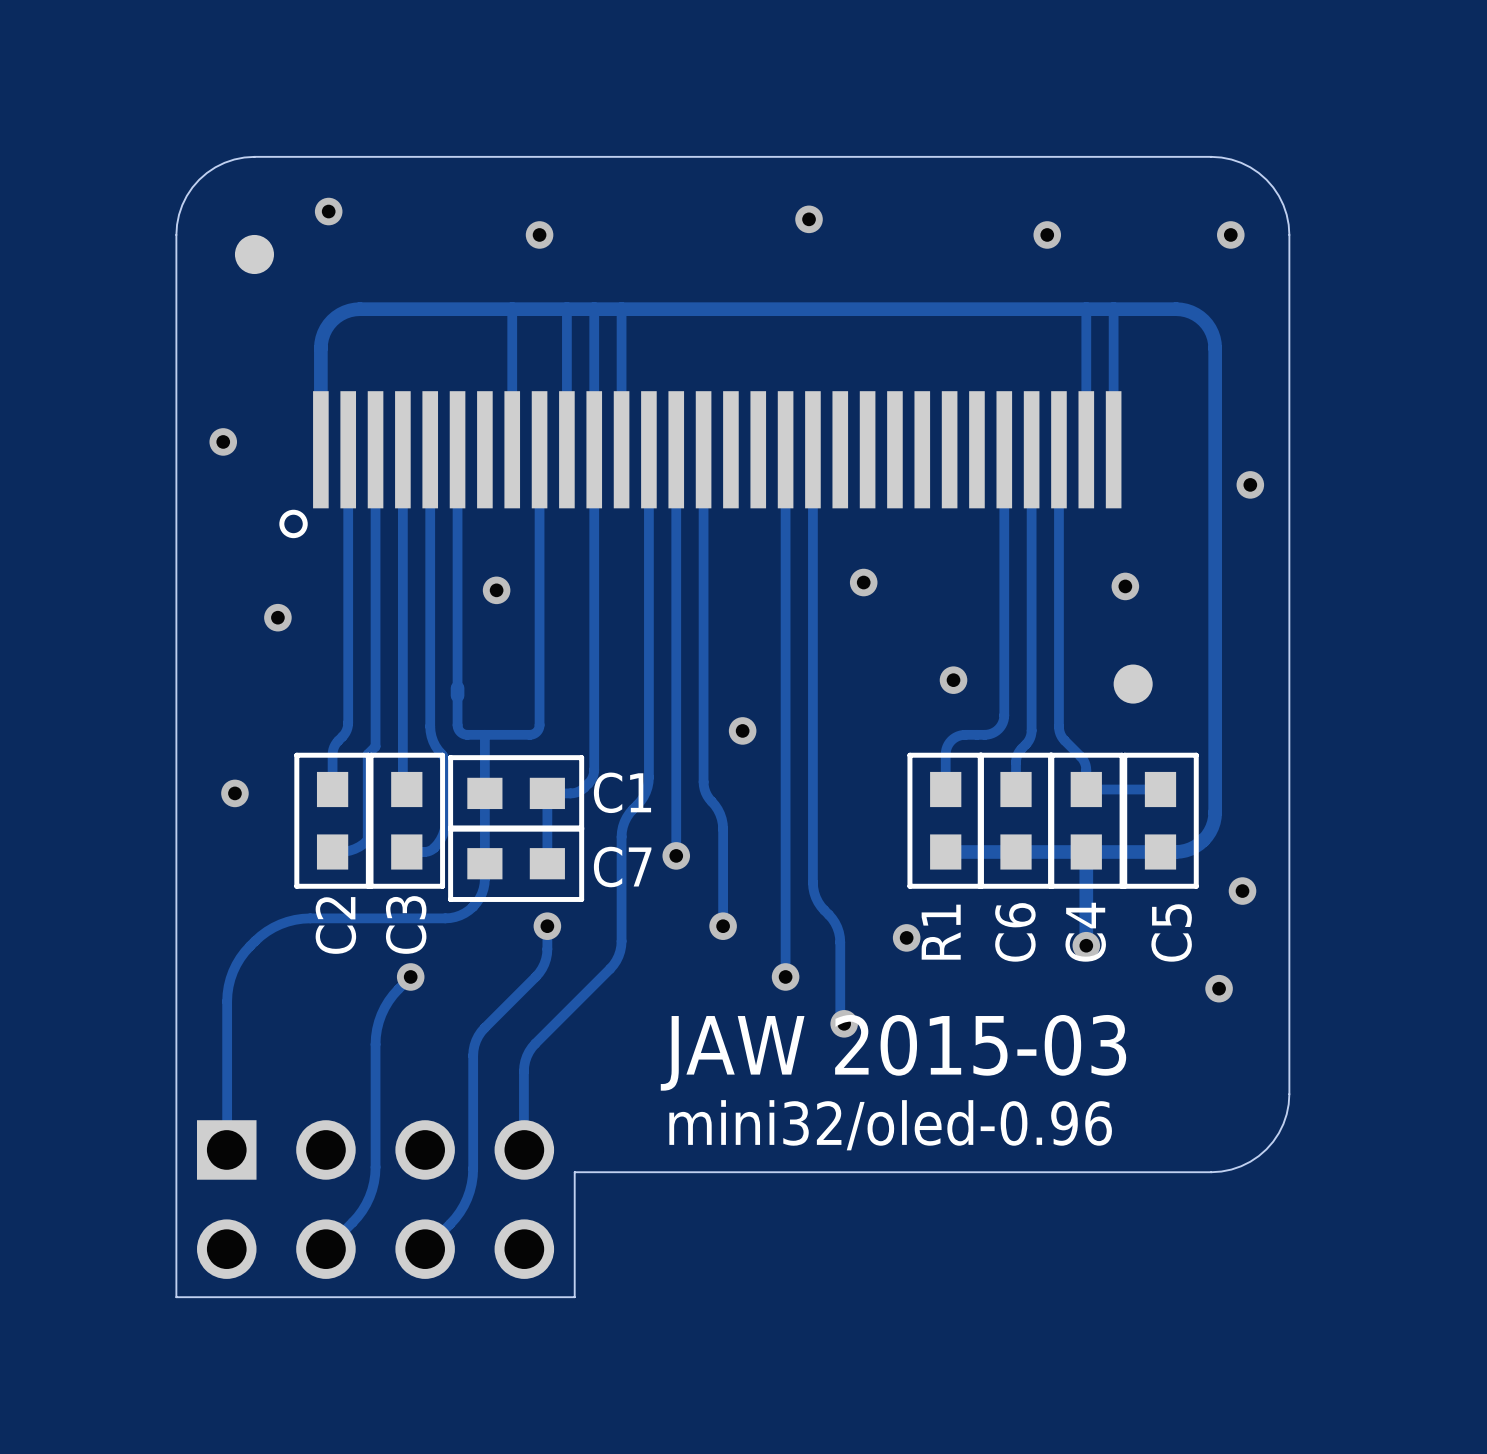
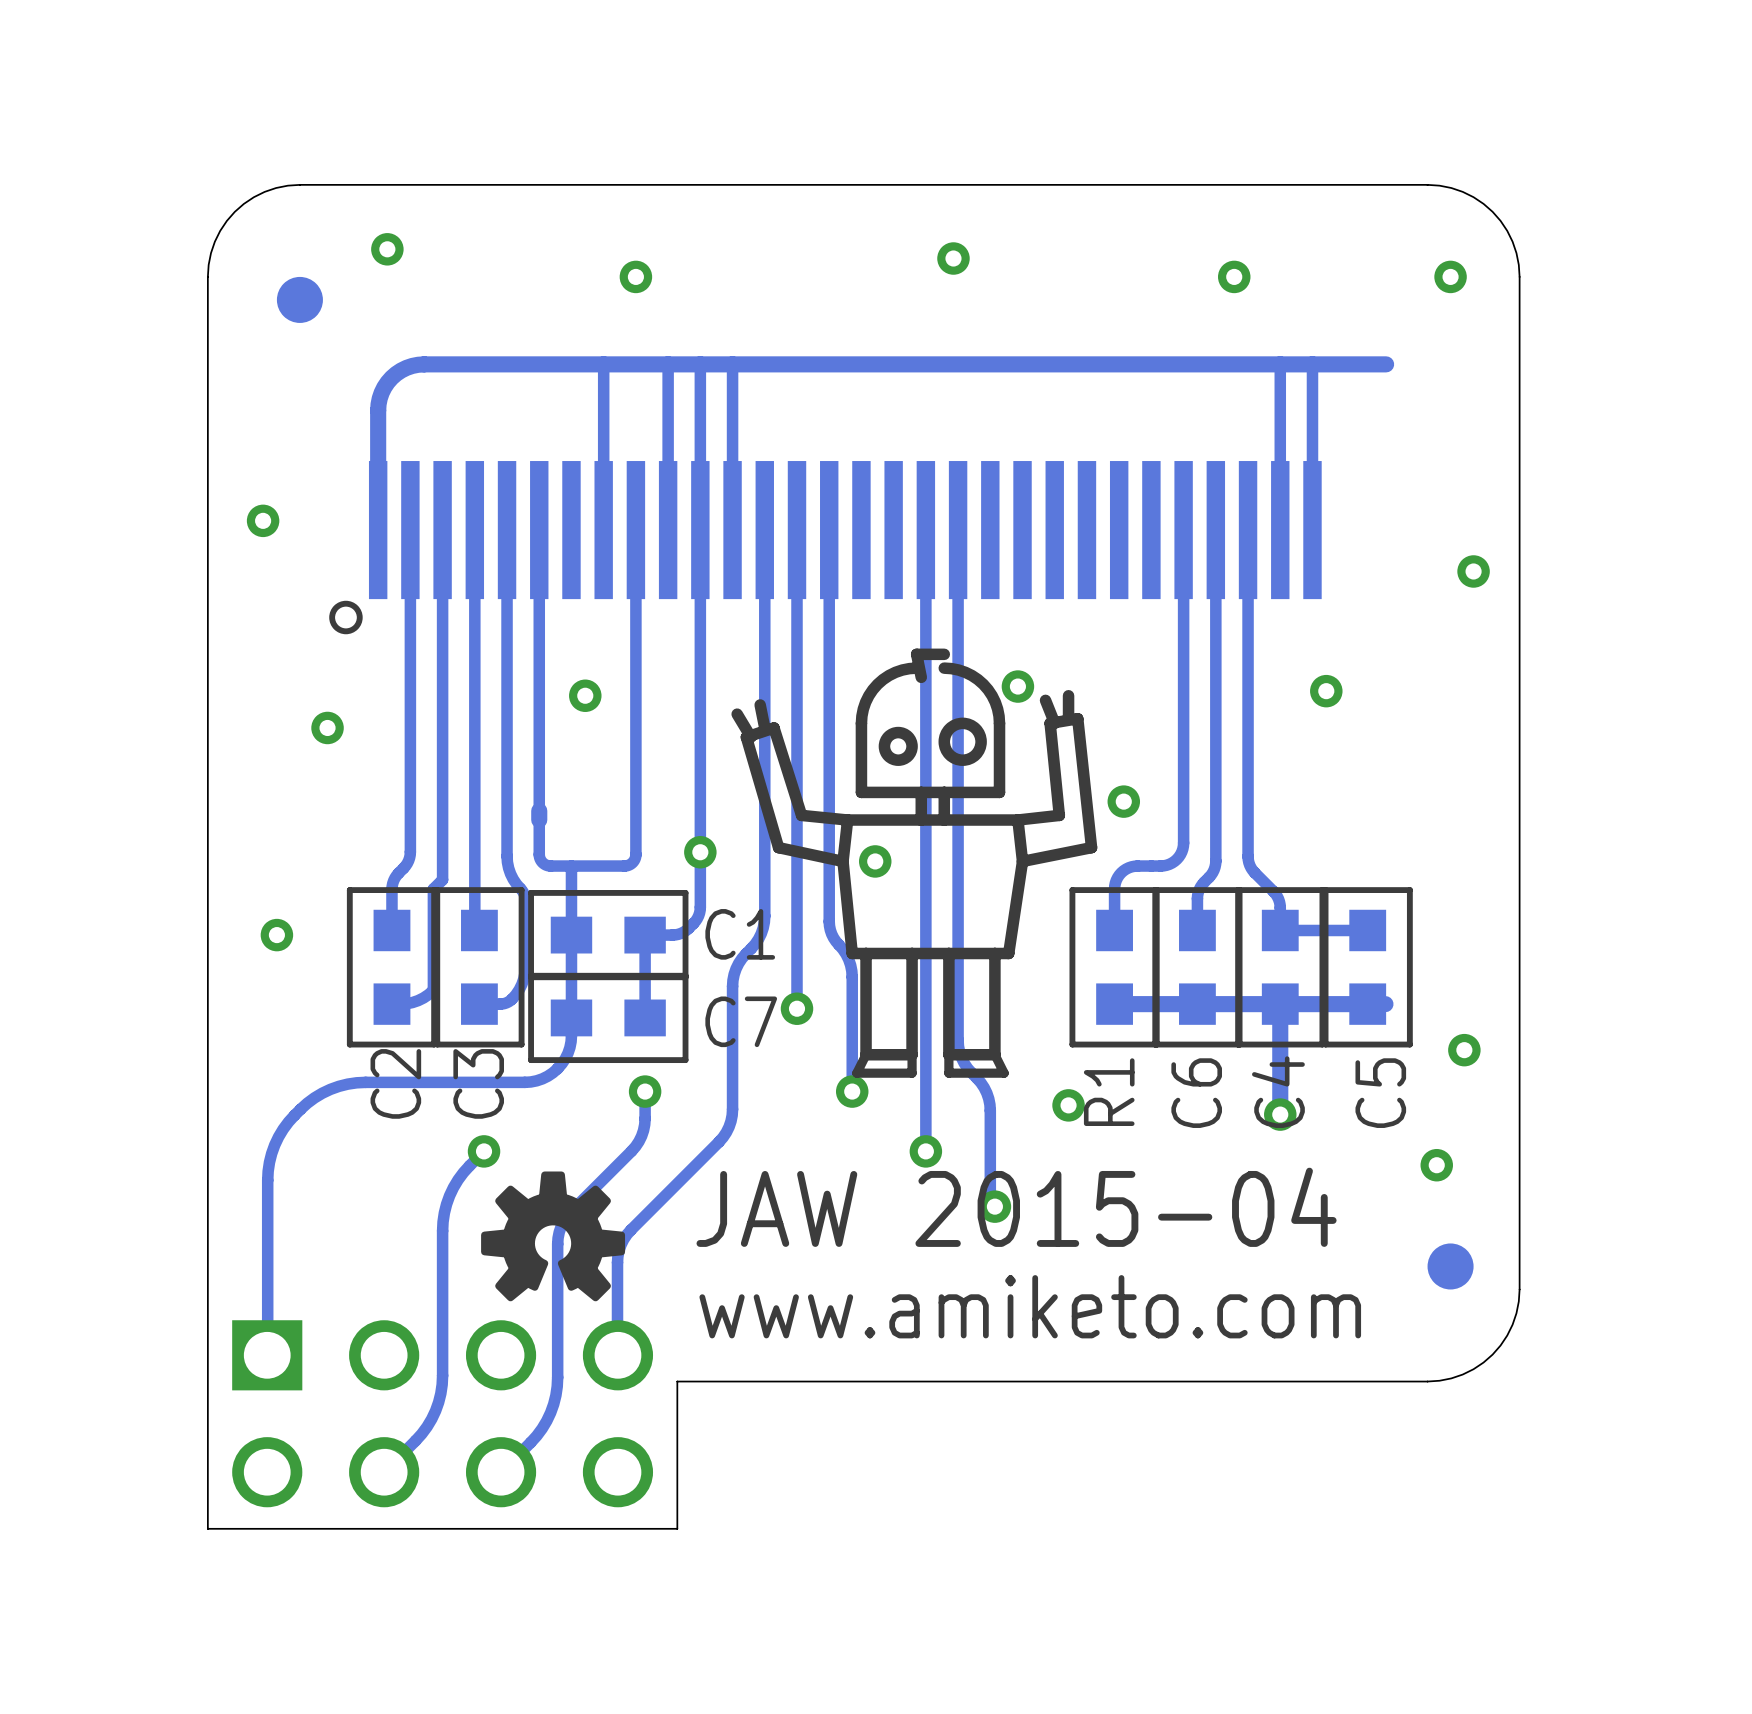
track: (1176, 309) (1186, 310) (1199, 317) (1209, 328) (1214, 343) (1215, 812) (1212, 827) (1203, 840) (1190, 849) (1175, 851) -> none
drawing: none -> [731, 648, 1098, 1078]
part position: (1133, 684) -> (1450, 1266)
via: none -> (700, 852)
drawing: none -> [481, 1171, 626, 1302]
text: JAW 2015-03 (893, 1052) -> JAW 2015-04 (1016, 1207)
text: none -> www.amiketo.com (1030, 1306)
text: mini32/oled-0.96 (890, 1125) -> none

